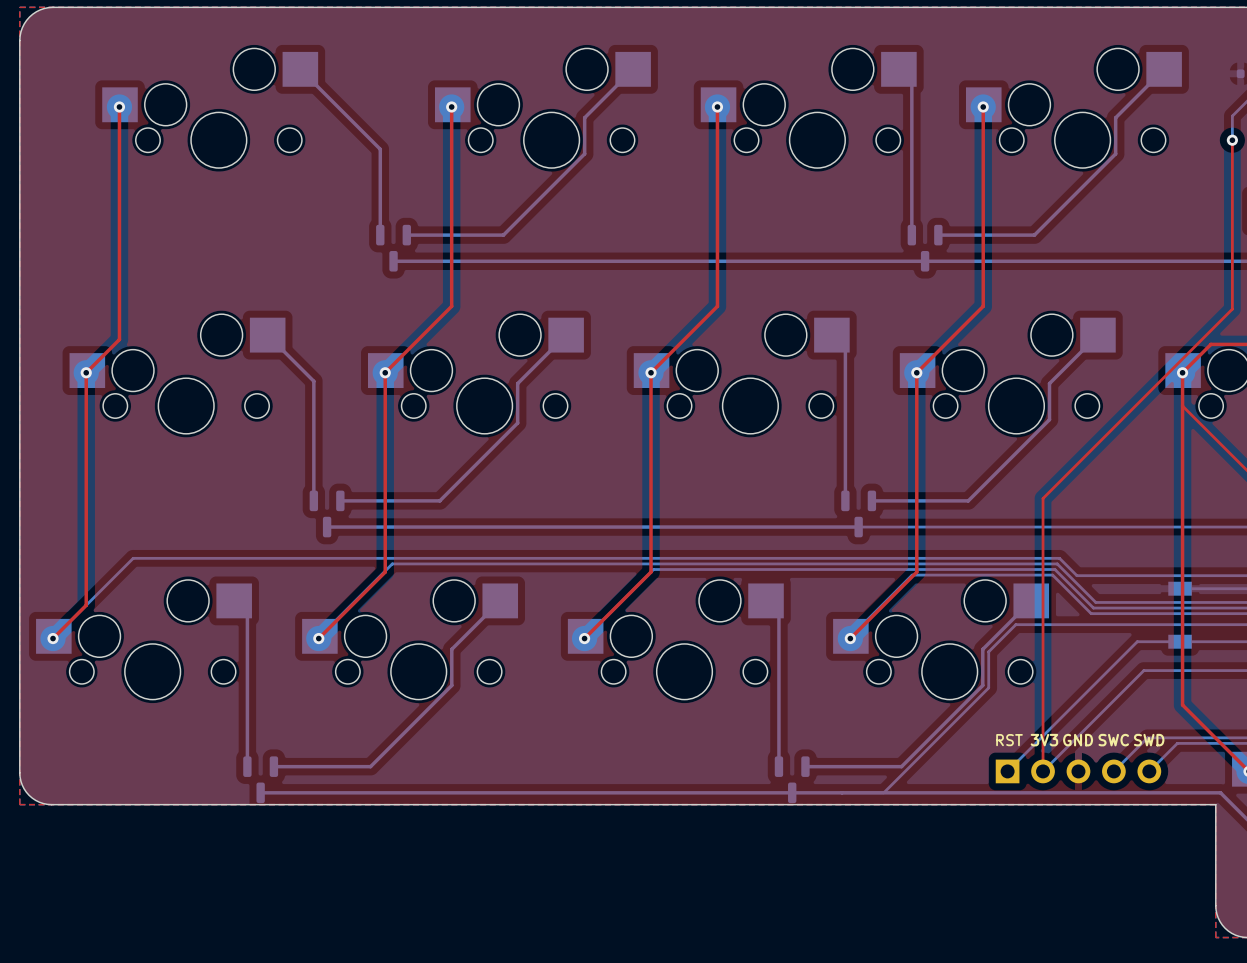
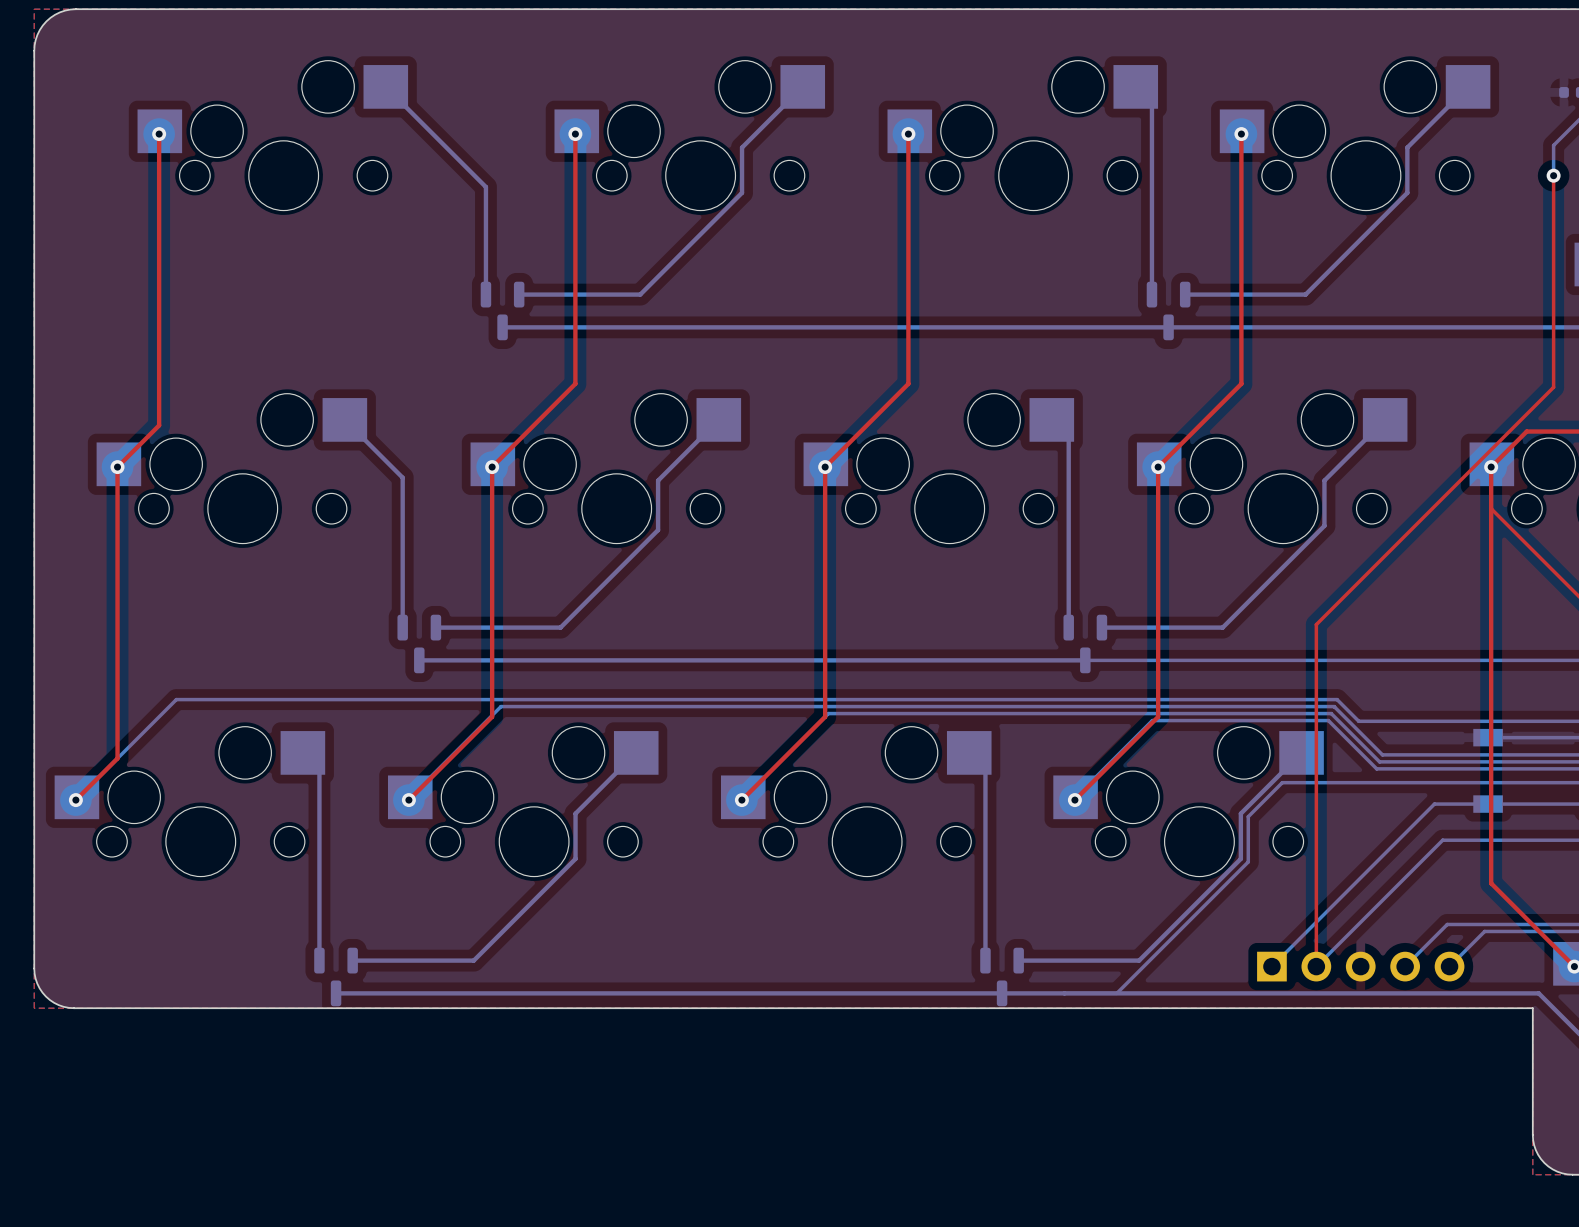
part text: RST (1009, 740) -> none
part text: 3V3 (1044, 740) -> none
part text: GND (1078, 740) -> none
part text: SWC (1113, 740) -> none
part text: SWD (1149, 740) -> none

